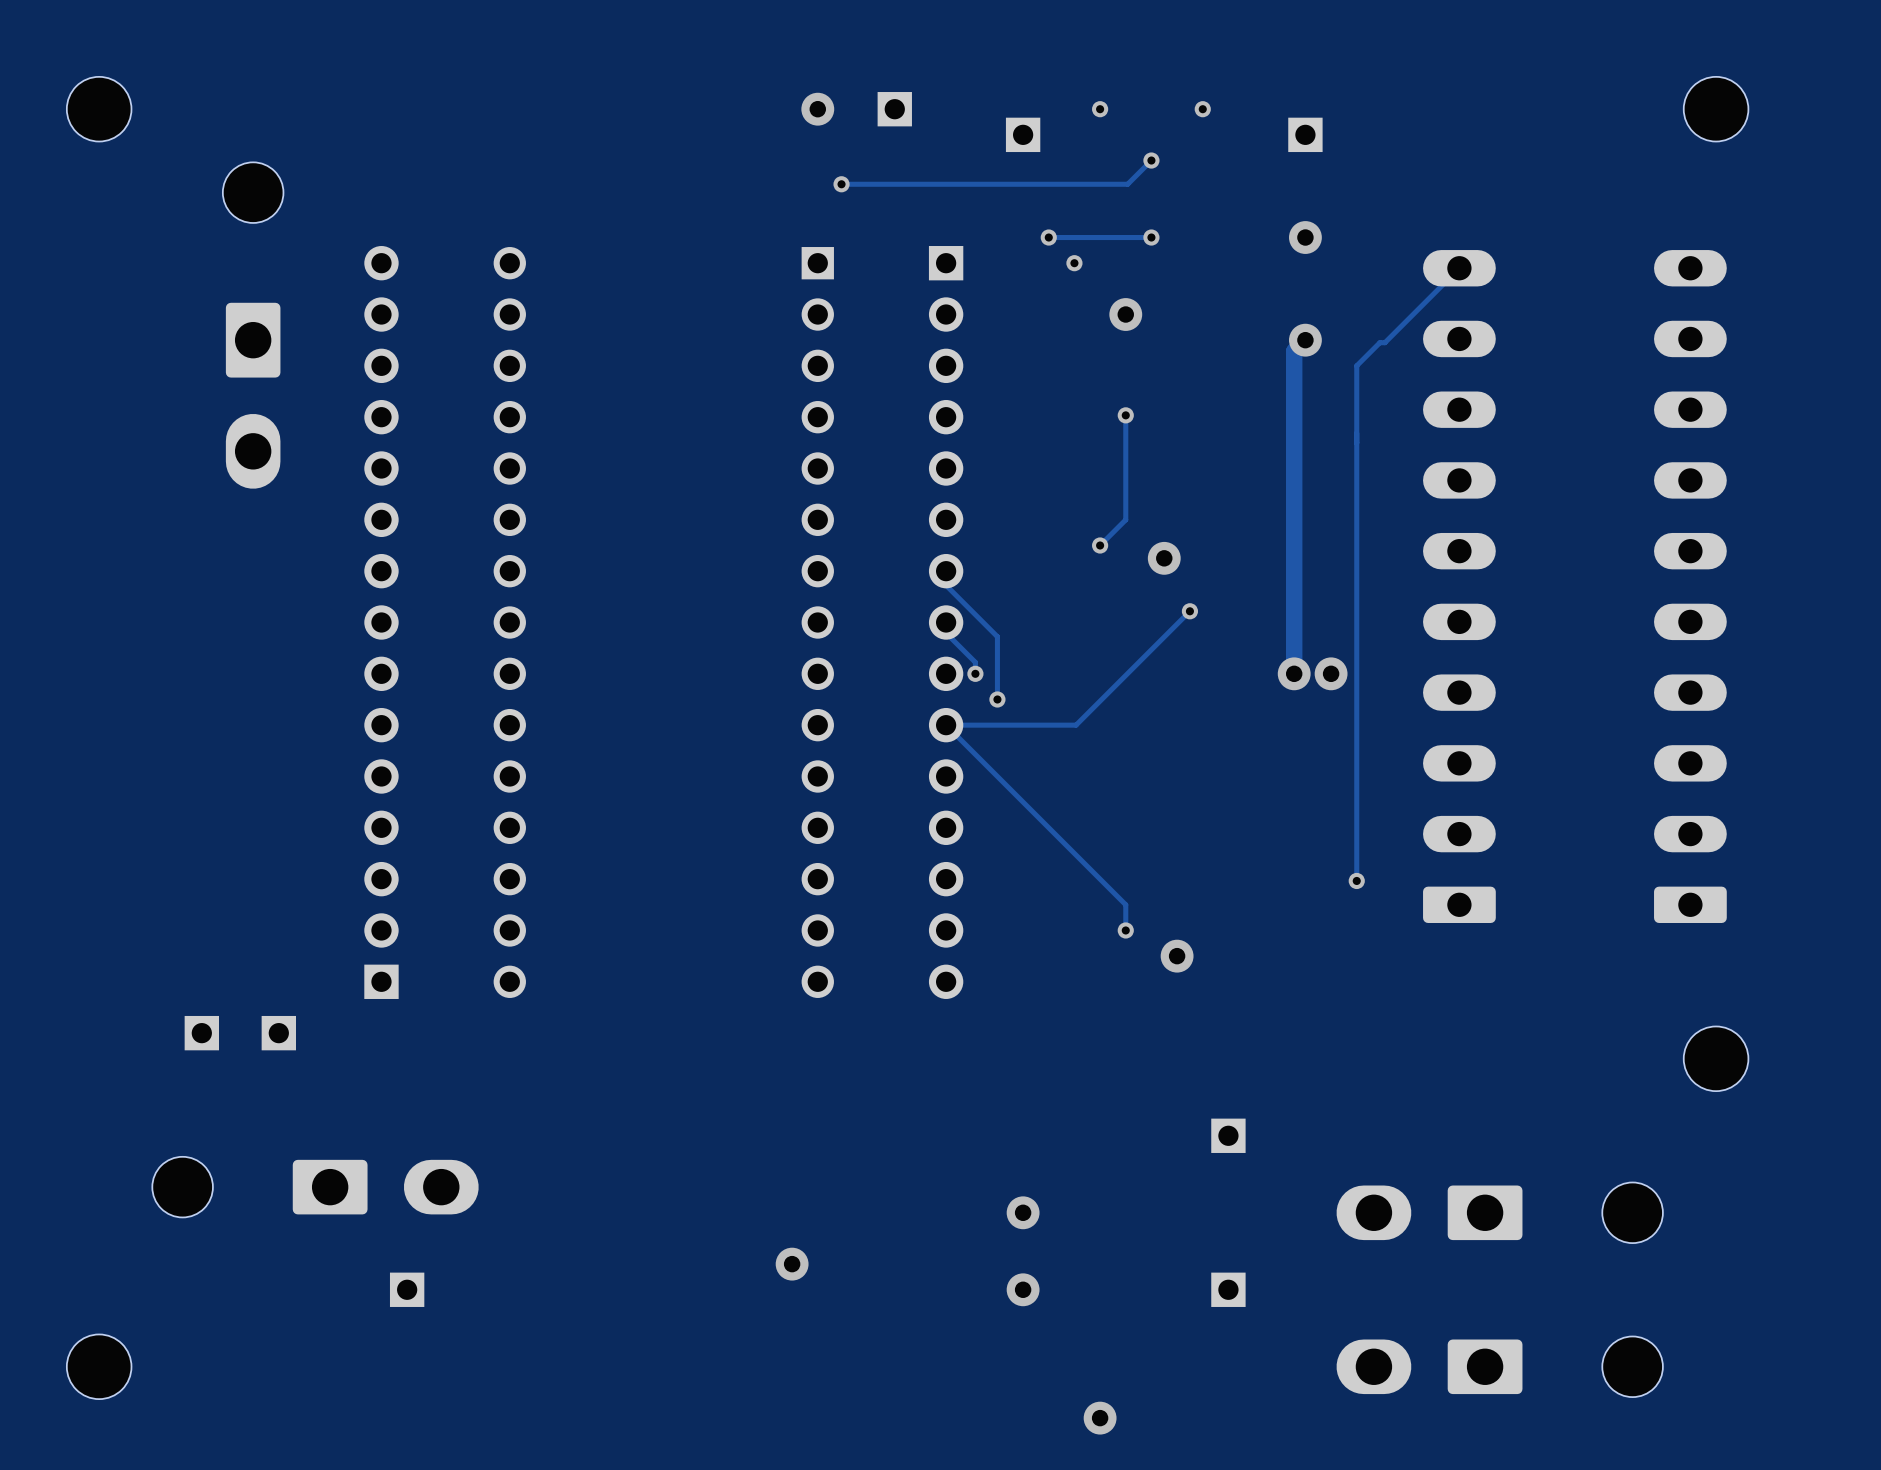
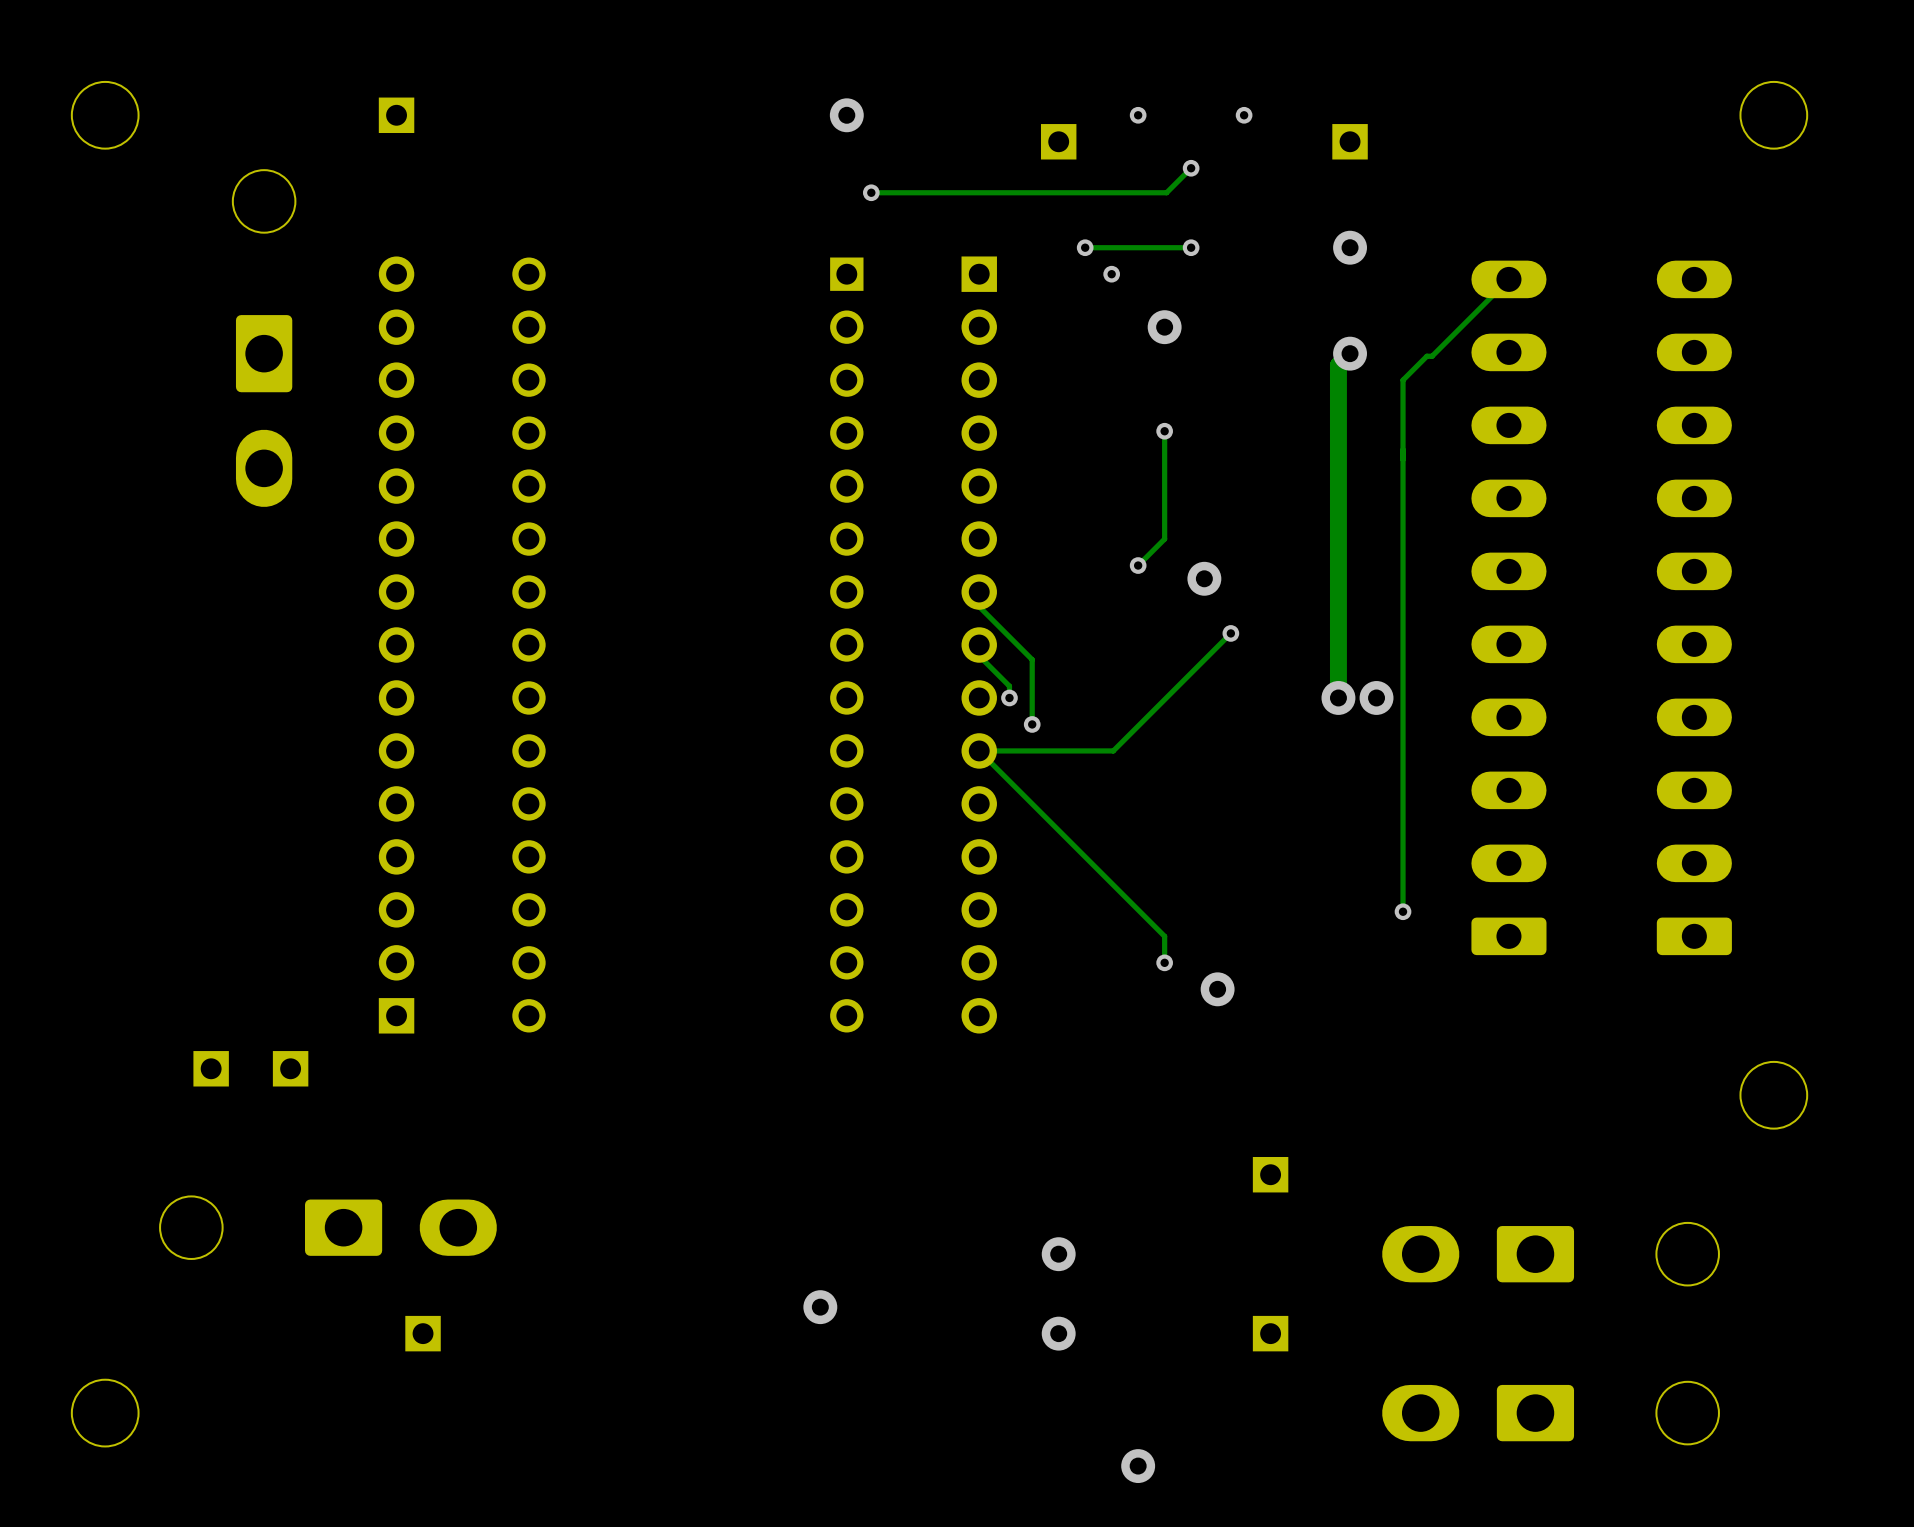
part: none -> (396, 115)
part: (894, 109) -> none
part position: (1690, 586) -> (1694, 607)

